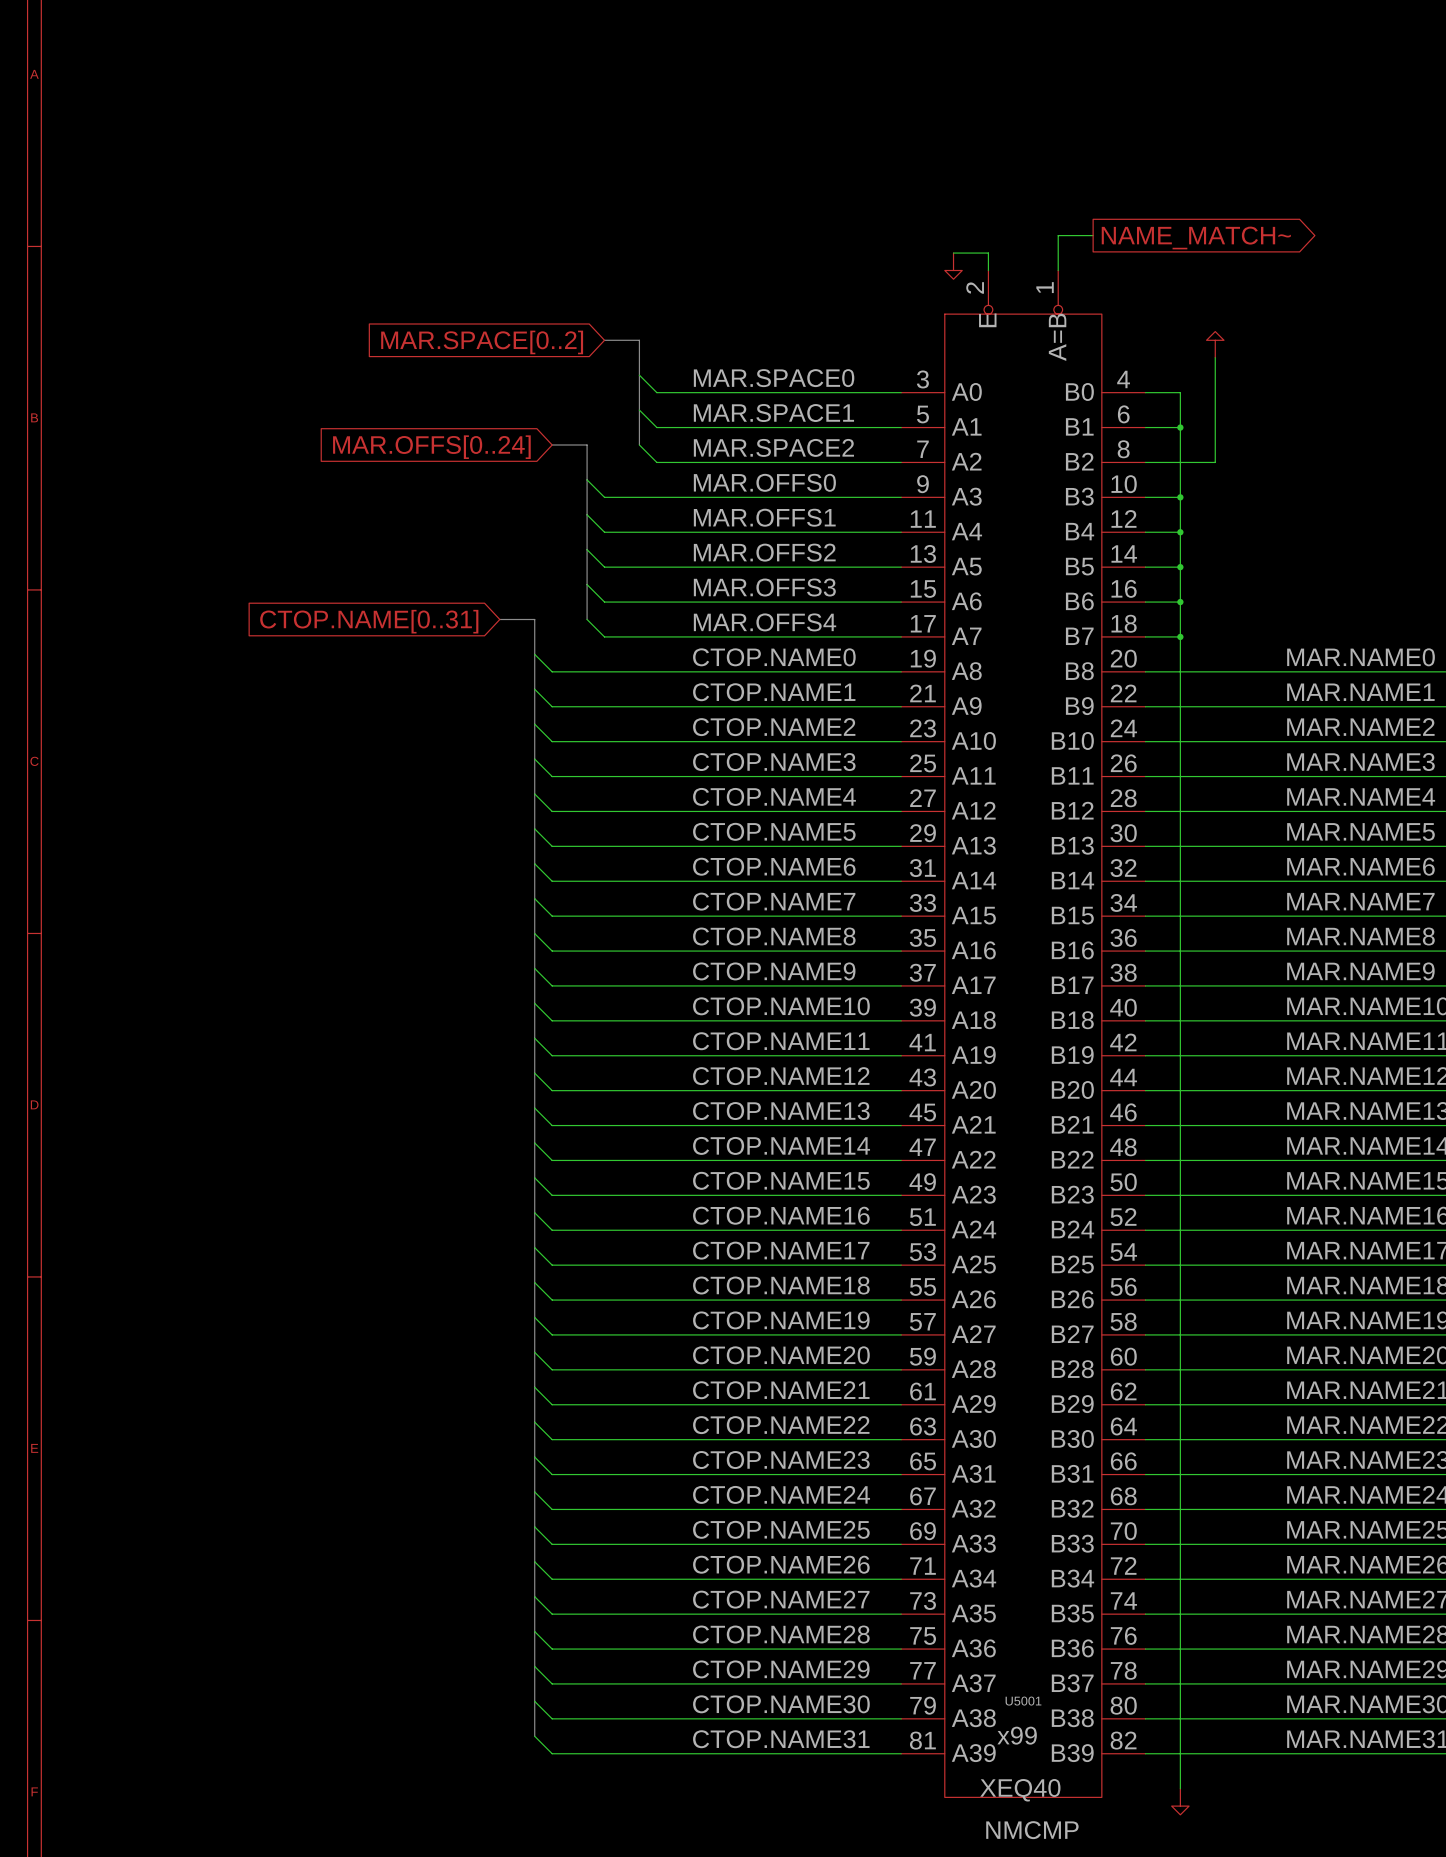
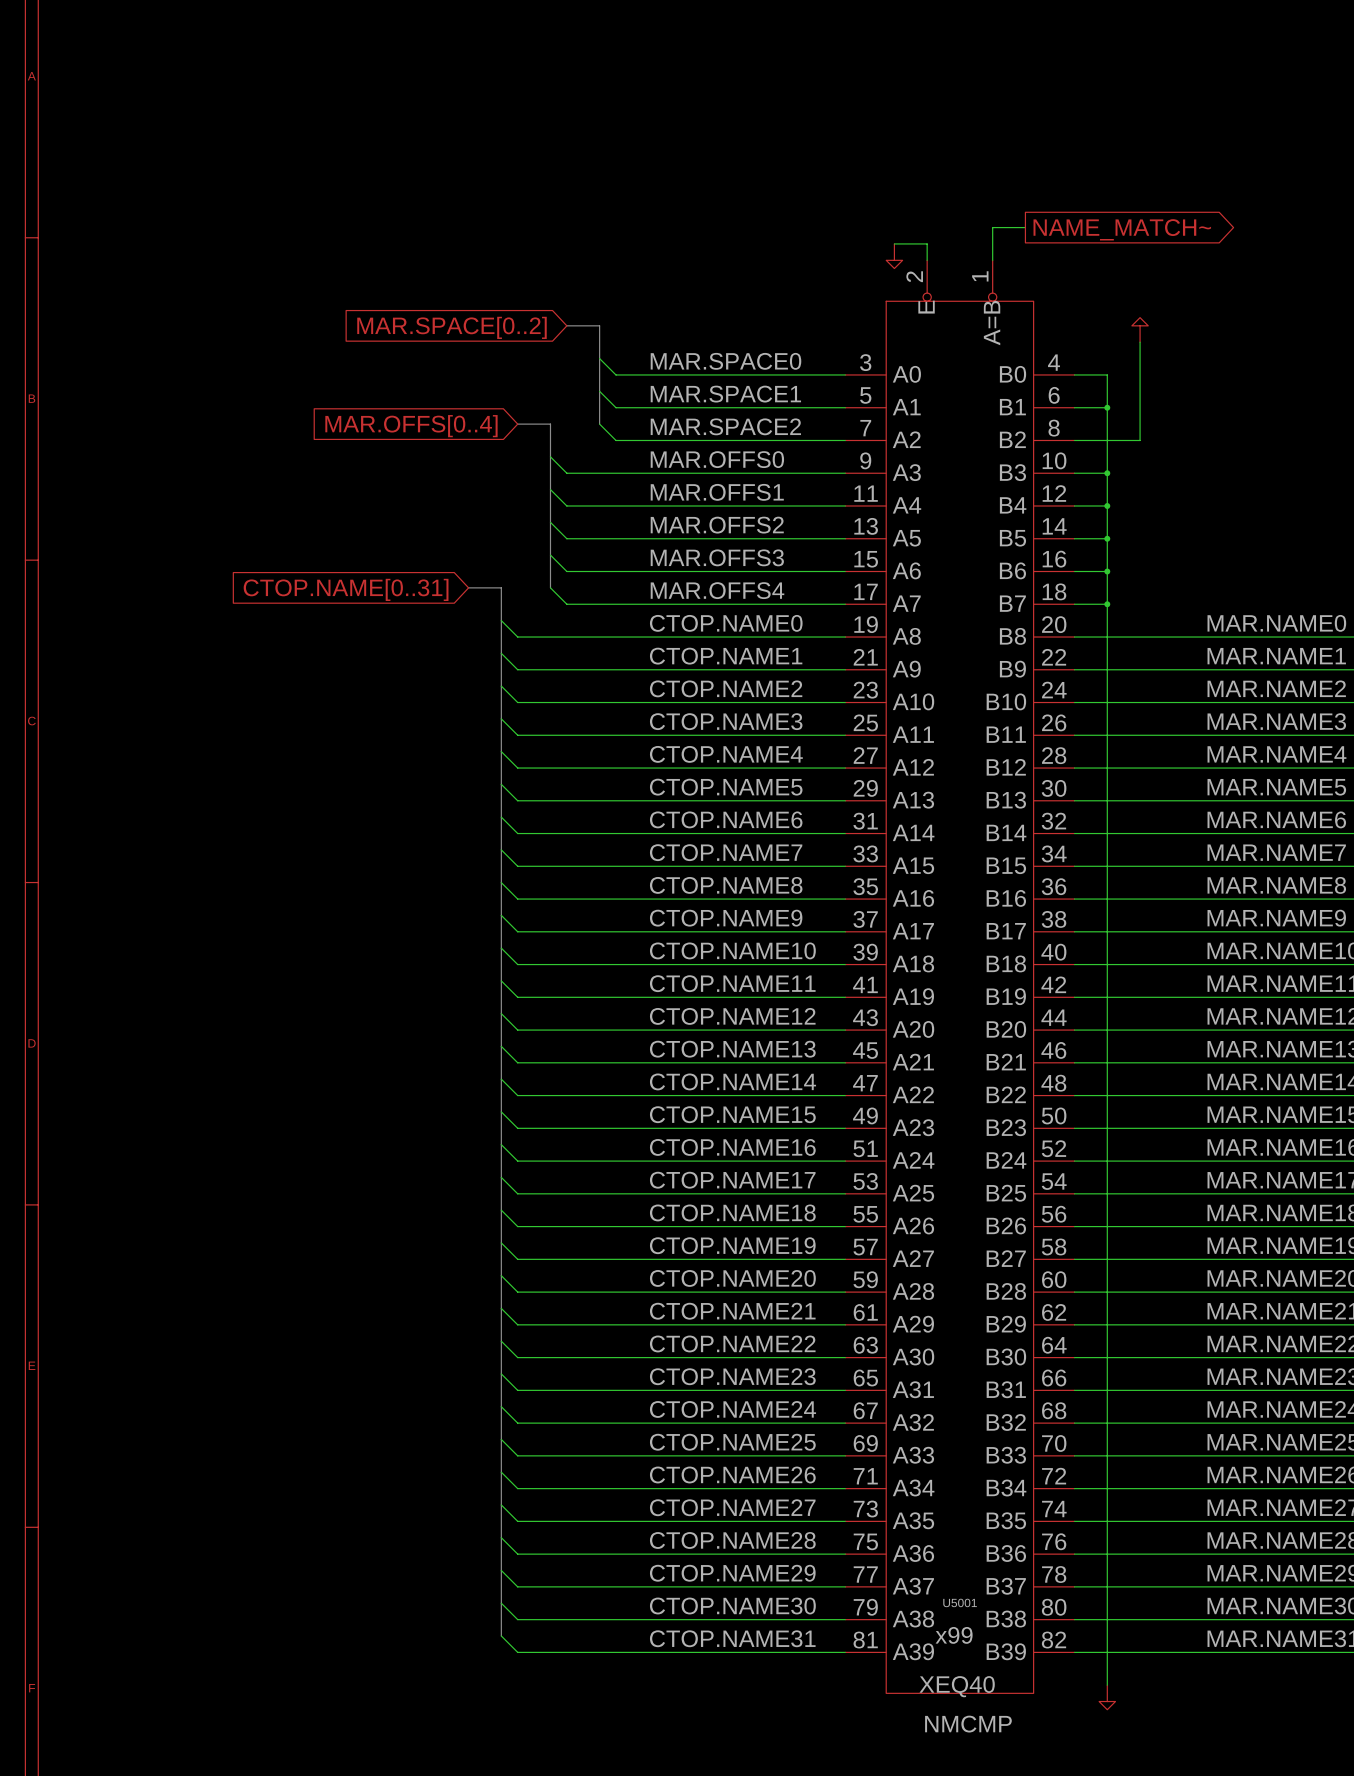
global label: MAR.OFFS[0..24] (431, 447) -> MAR.OFFS[0..4] (411, 426)

